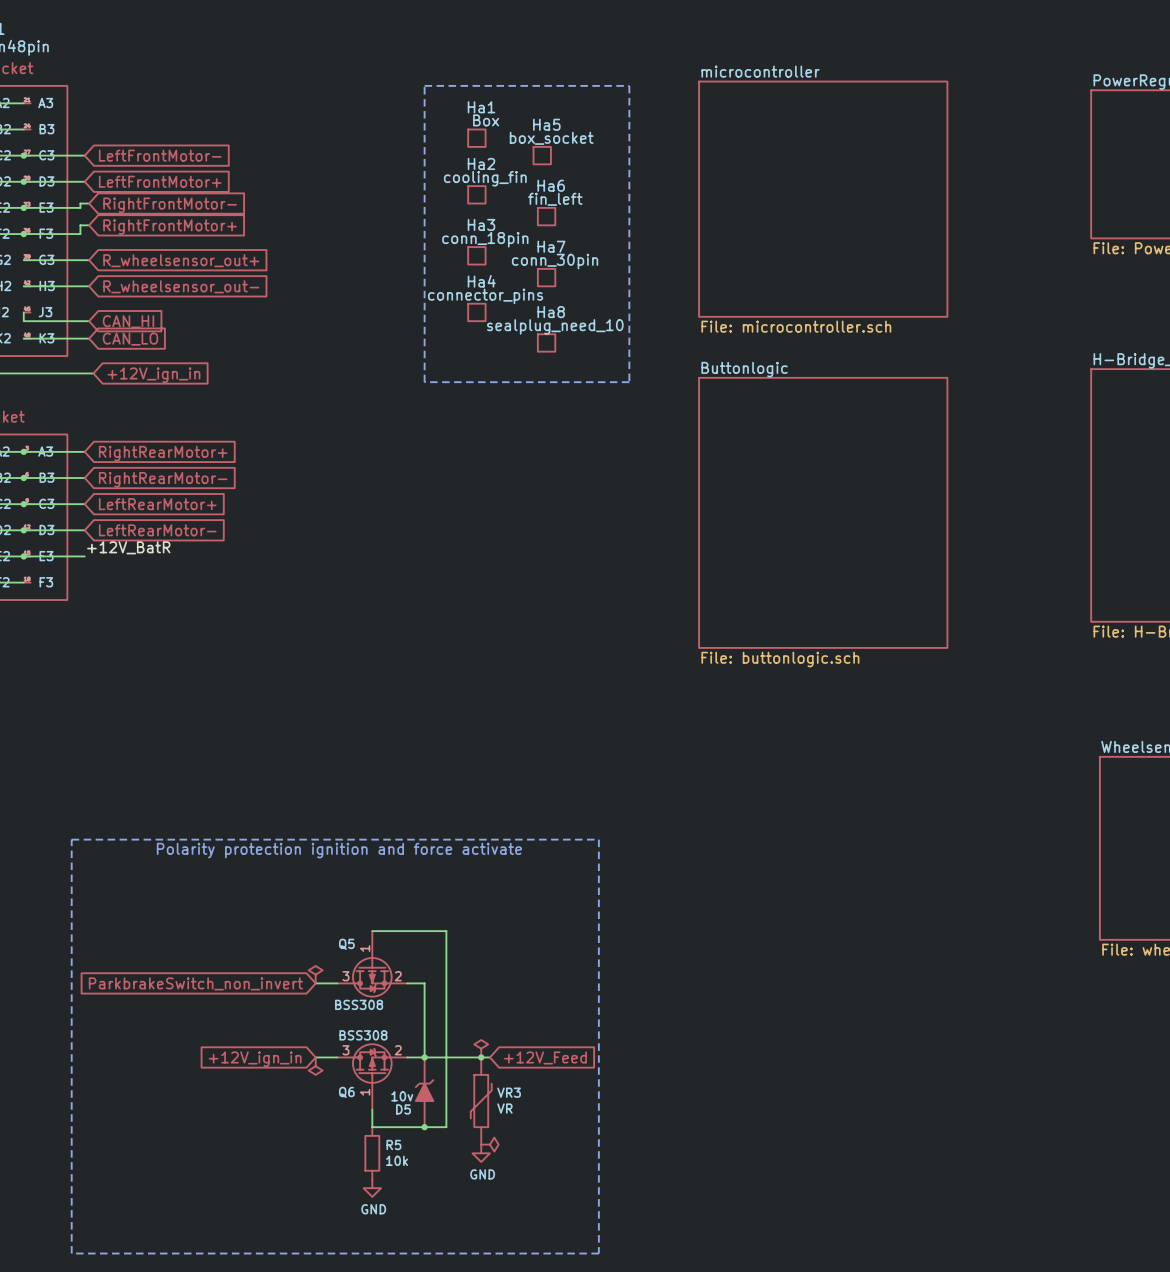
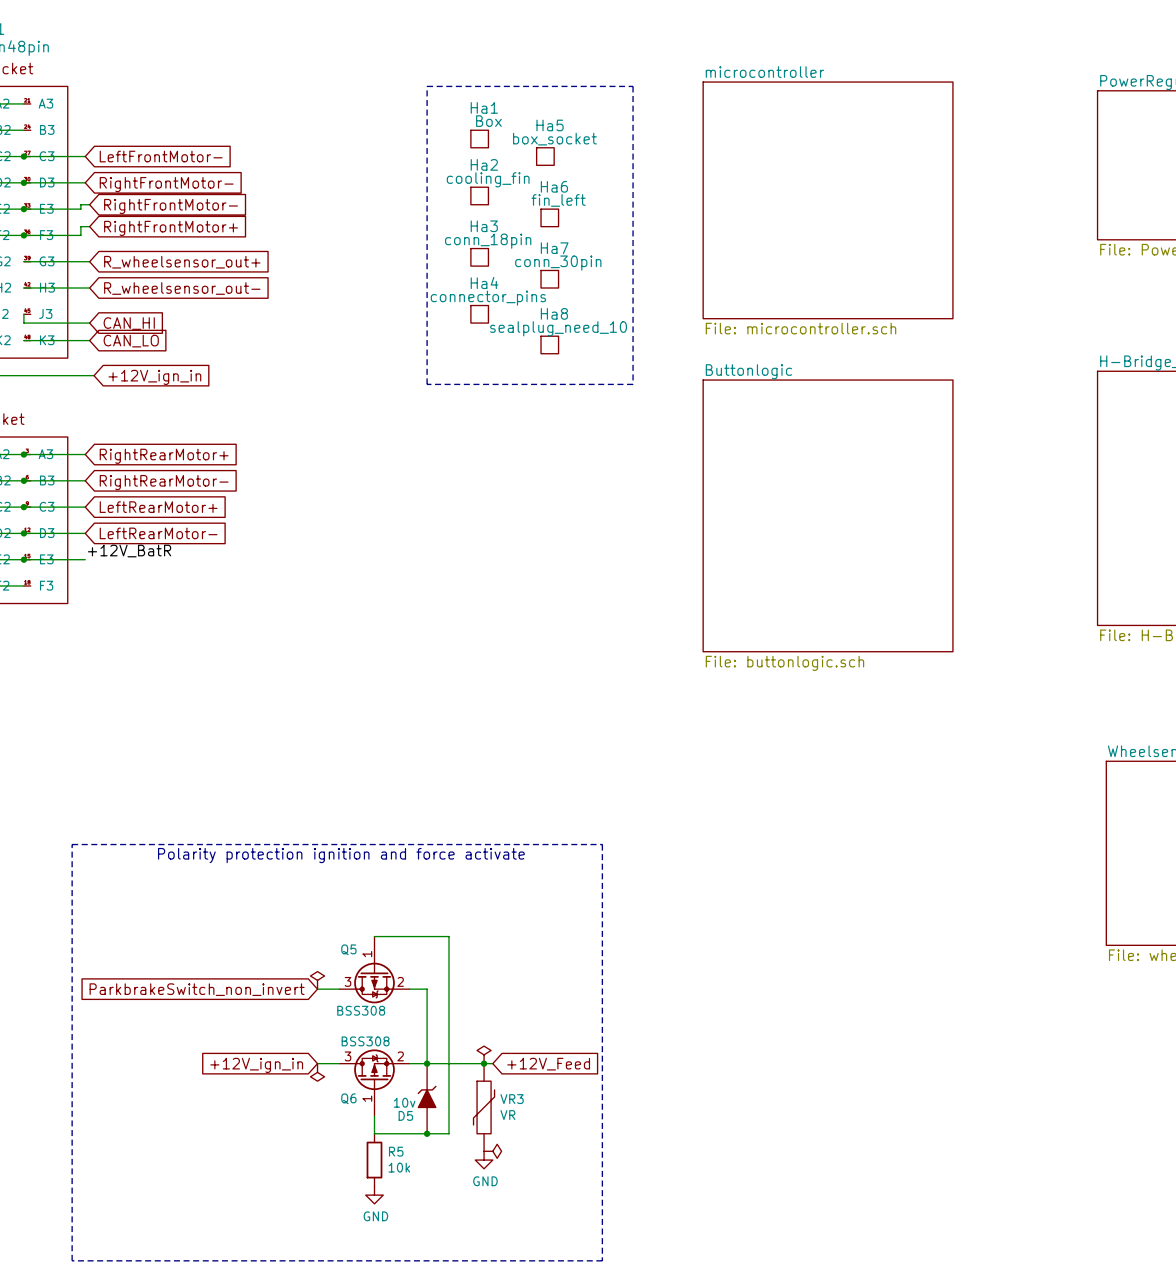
global label: LeftFrontMotor+ (160, 181) -> RightFrontMotor- (166, 184)

